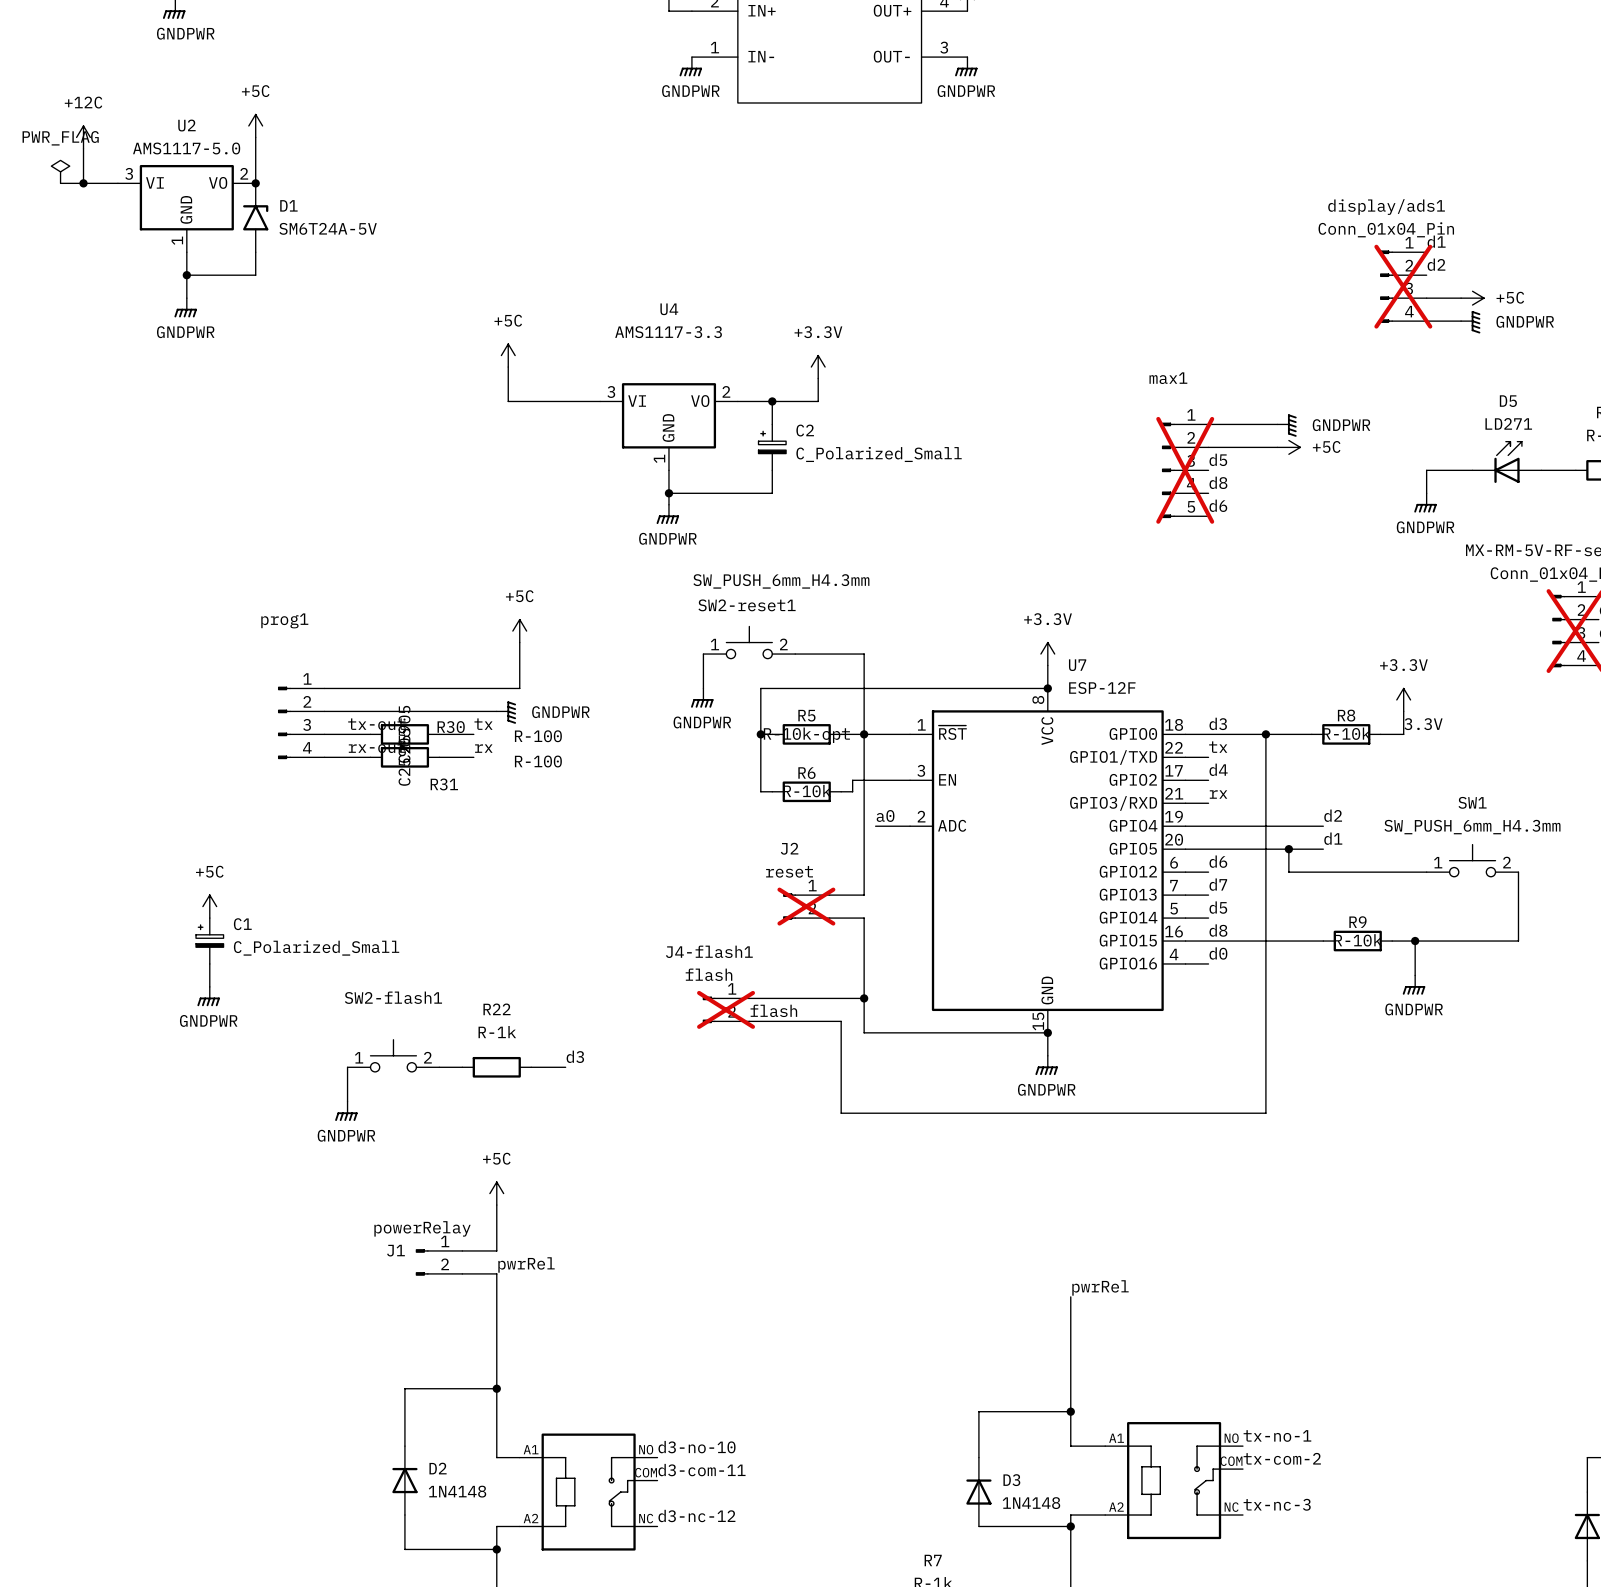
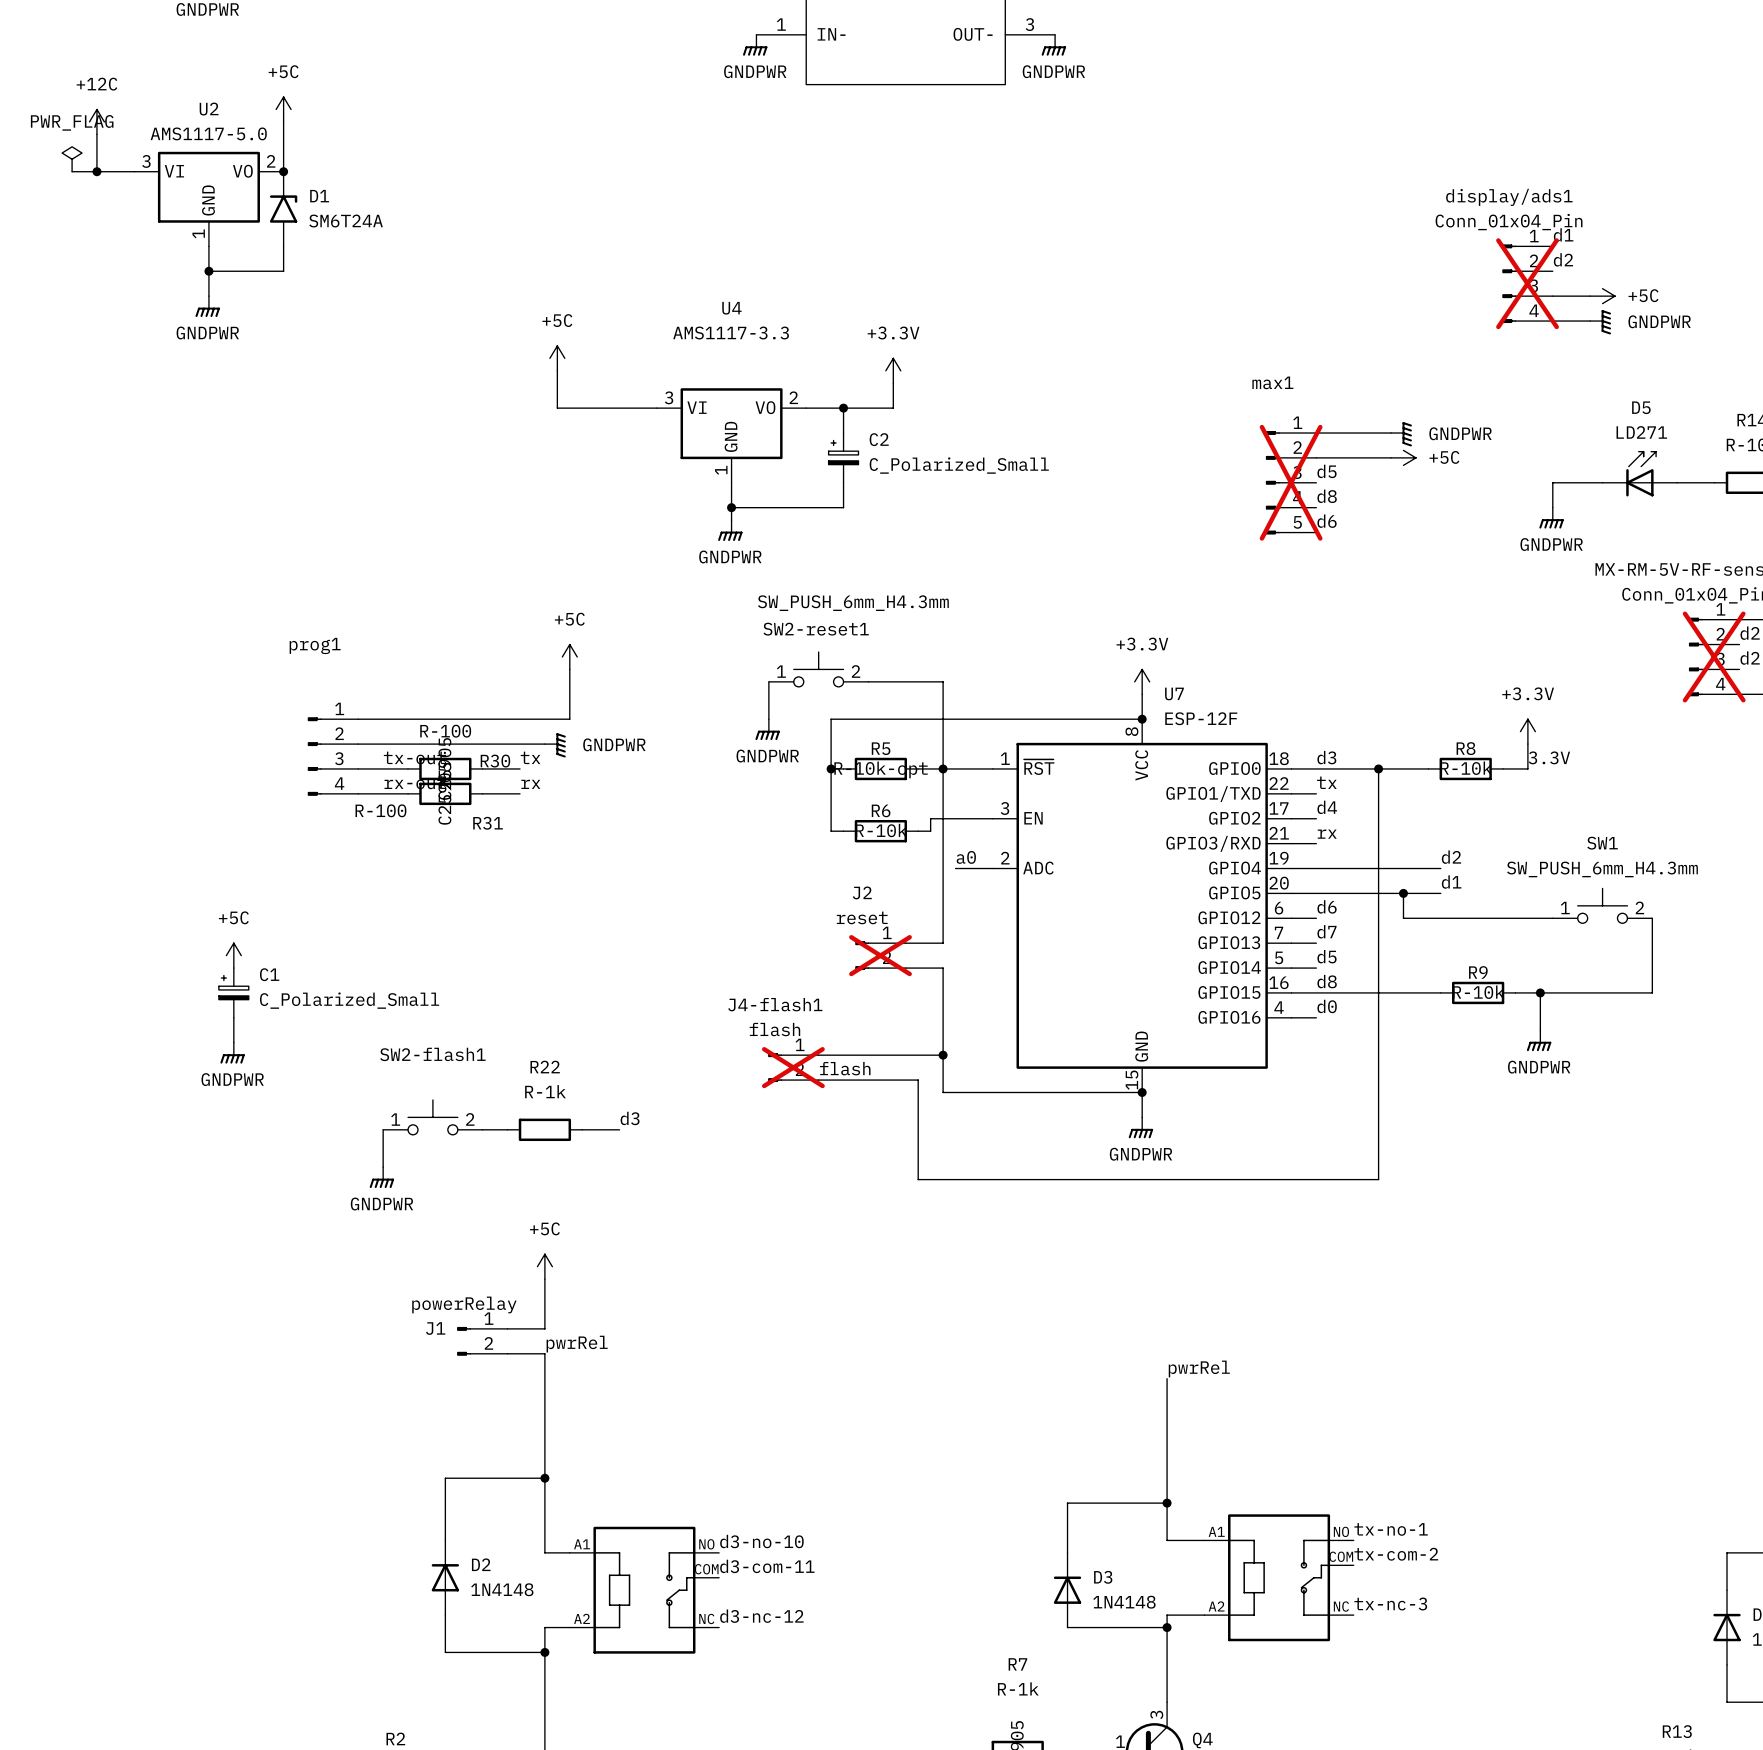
D1 value: SM6T24A-5V (328, 228) -> SM6T24A (346, 221)
R30 value position: R-100 (538, 736) -> R-100 (380, 810)
R31 value position: R-100 (538, 761) -> R-100 (445, 731)

